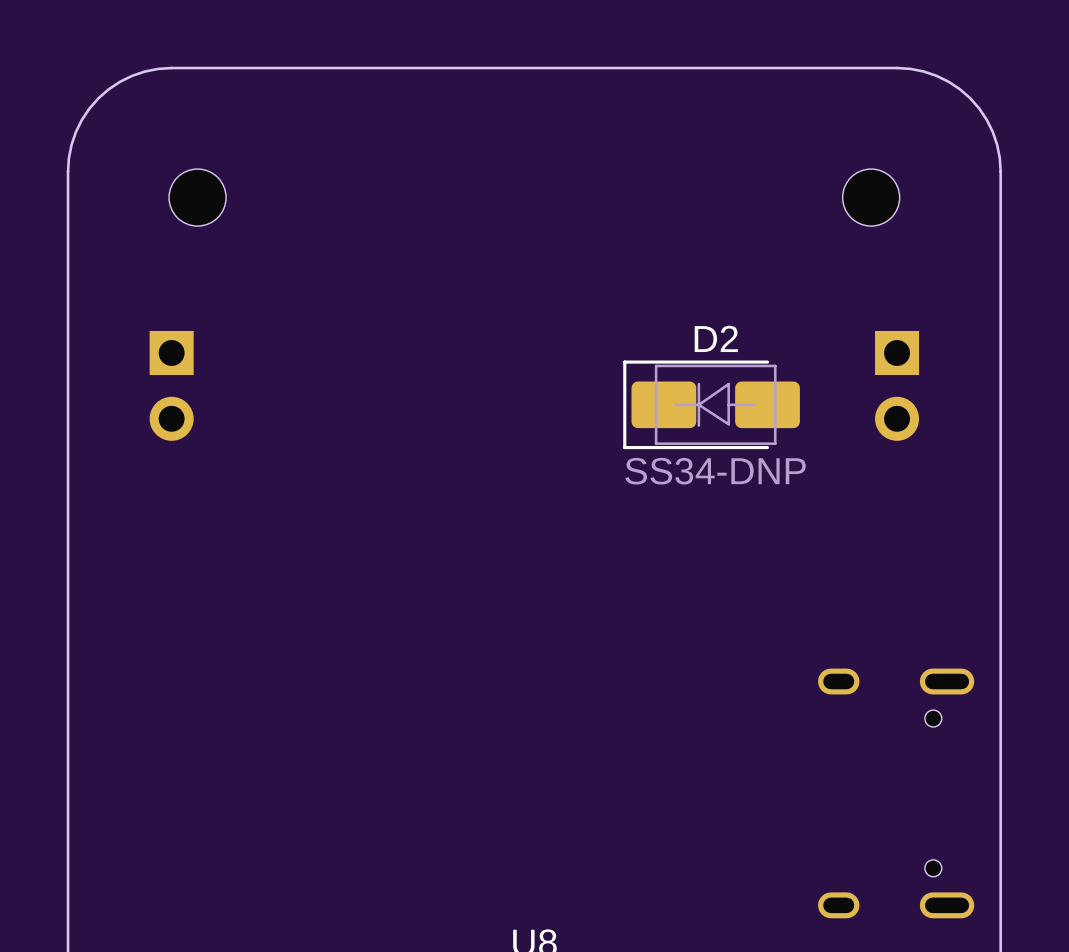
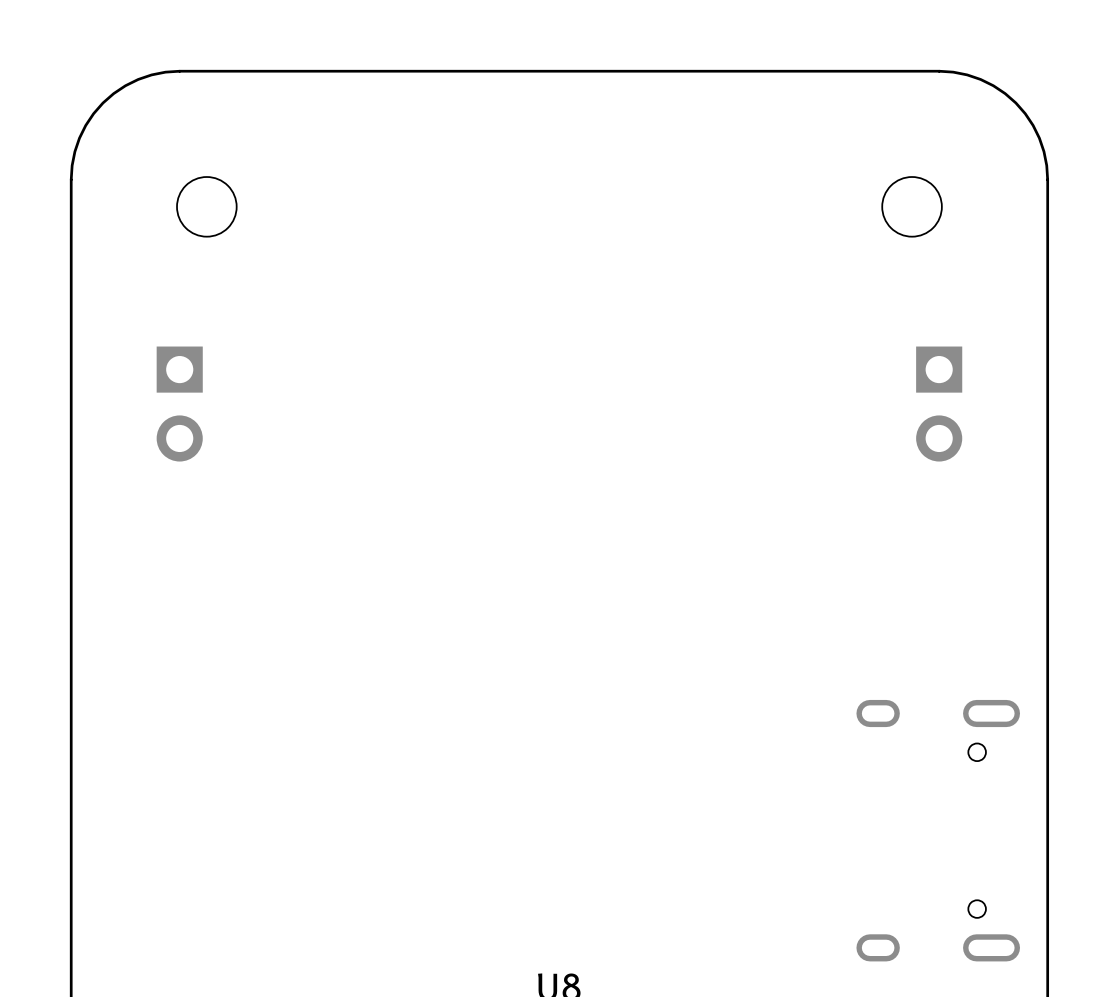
D2: SS34-DNP (711, 404) -> none

